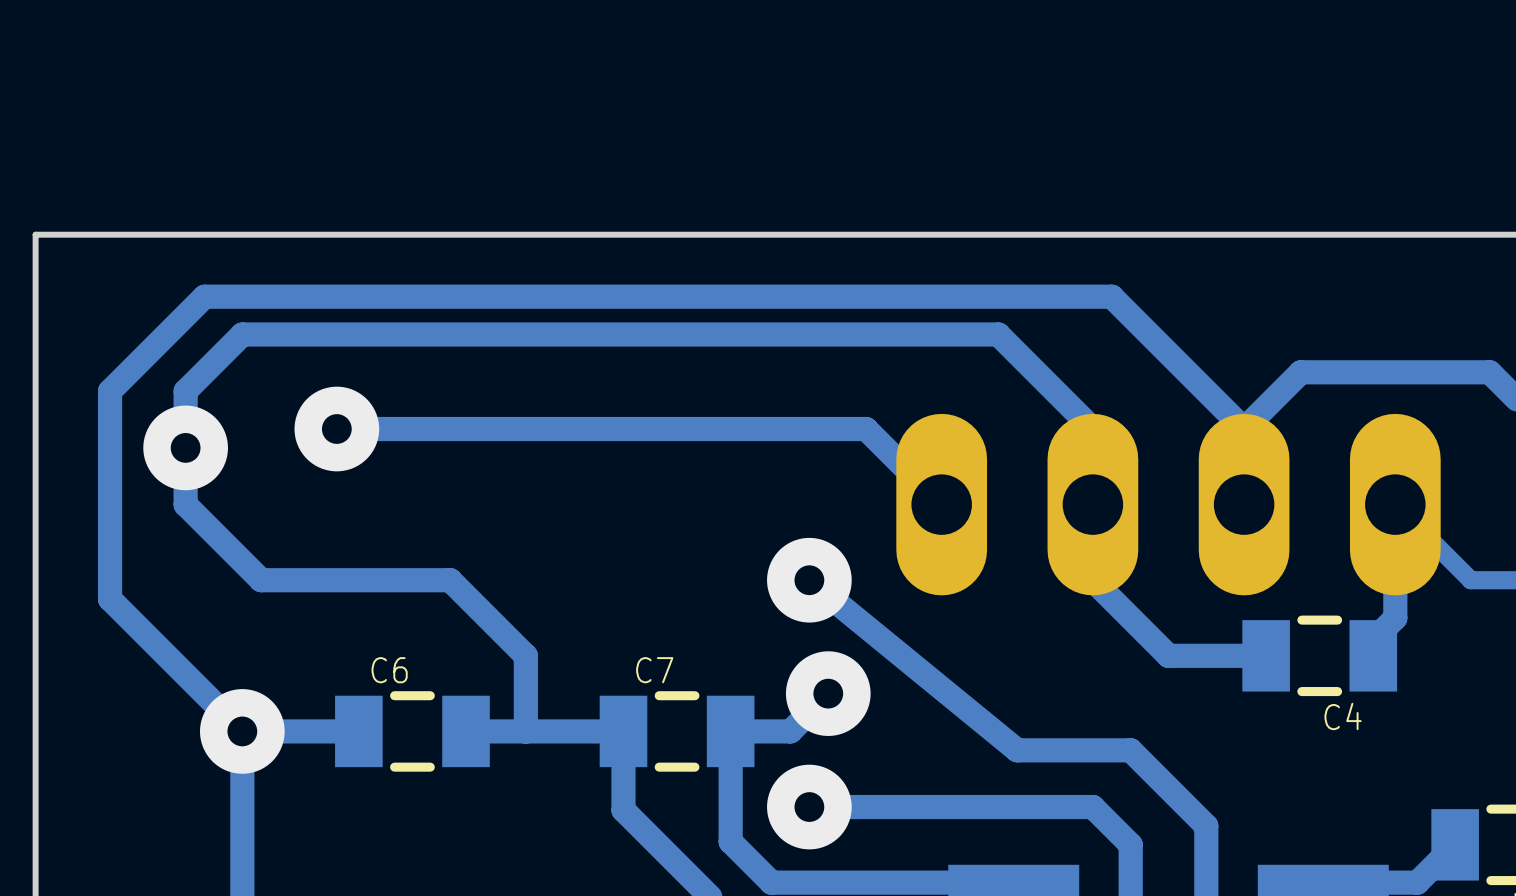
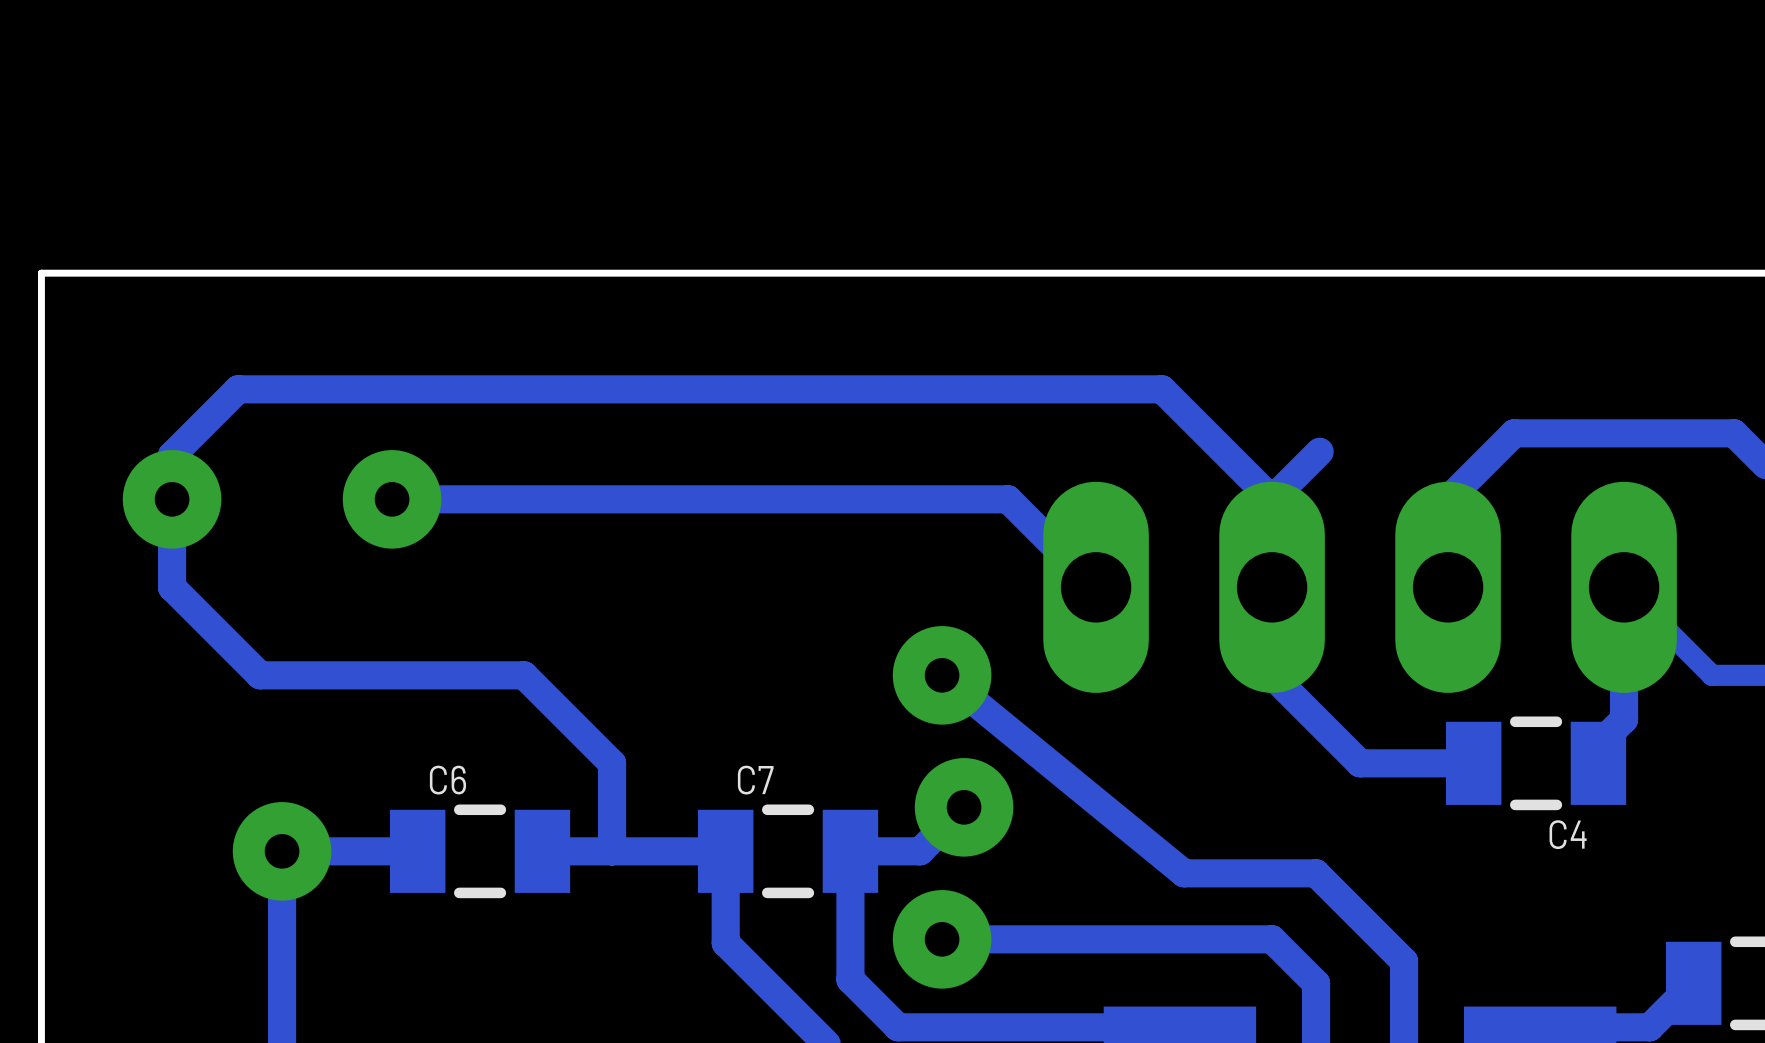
track: (242, 334) (185, 391) (185, 504) (261, 580) -> (282, 389) (238, 389) (172, 455) (172, 587) (260, 675) (304, 675)
track: none -> (1319, 451) (1272, 499)
track: (1244, 429) (1111, 296) (204, 296) (110, 391) (110, 599) (242, 731) -> none
via position: (185, 447) -> (172, 499)

